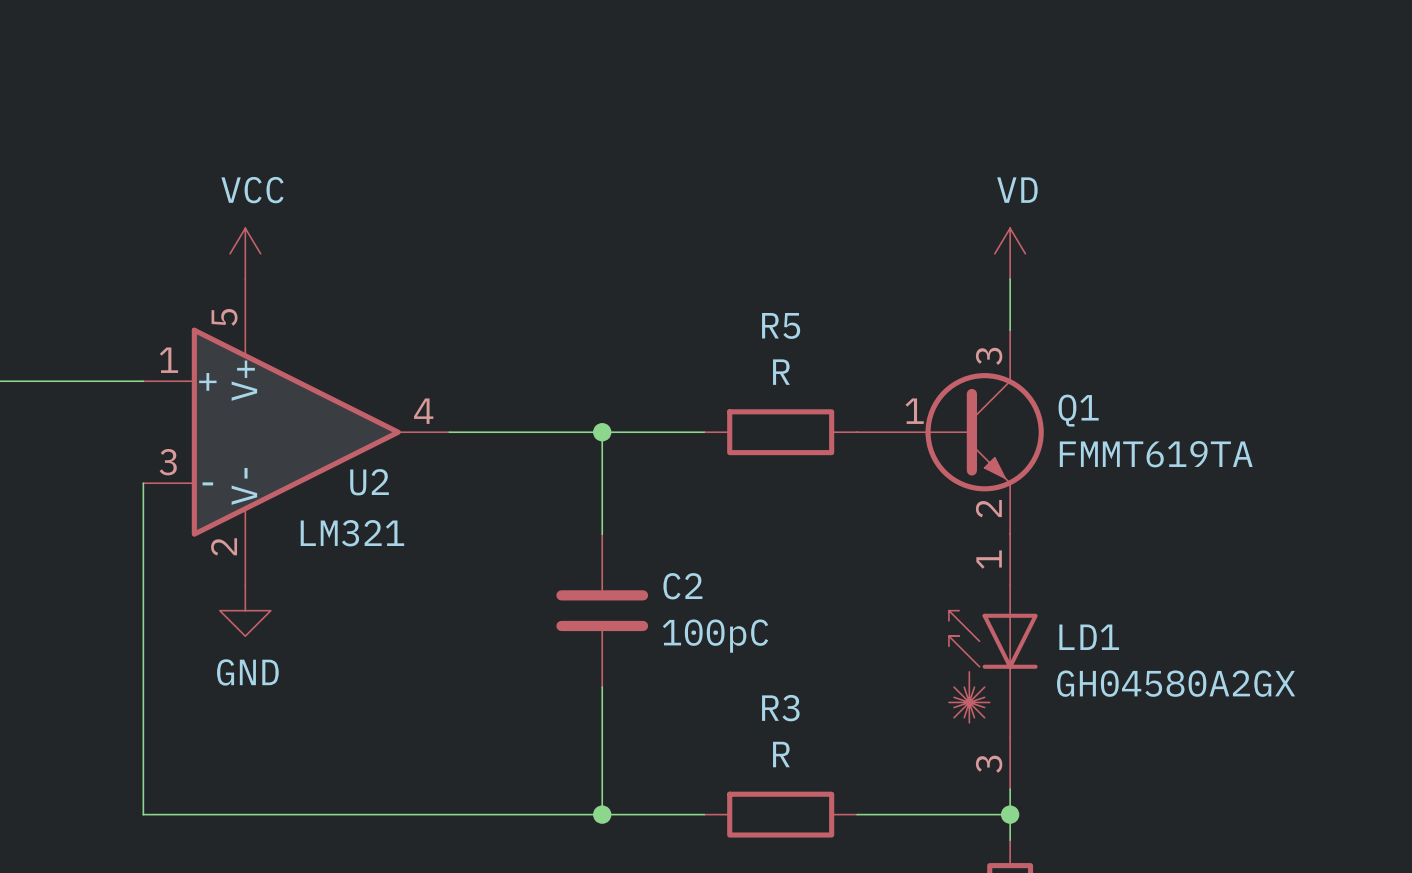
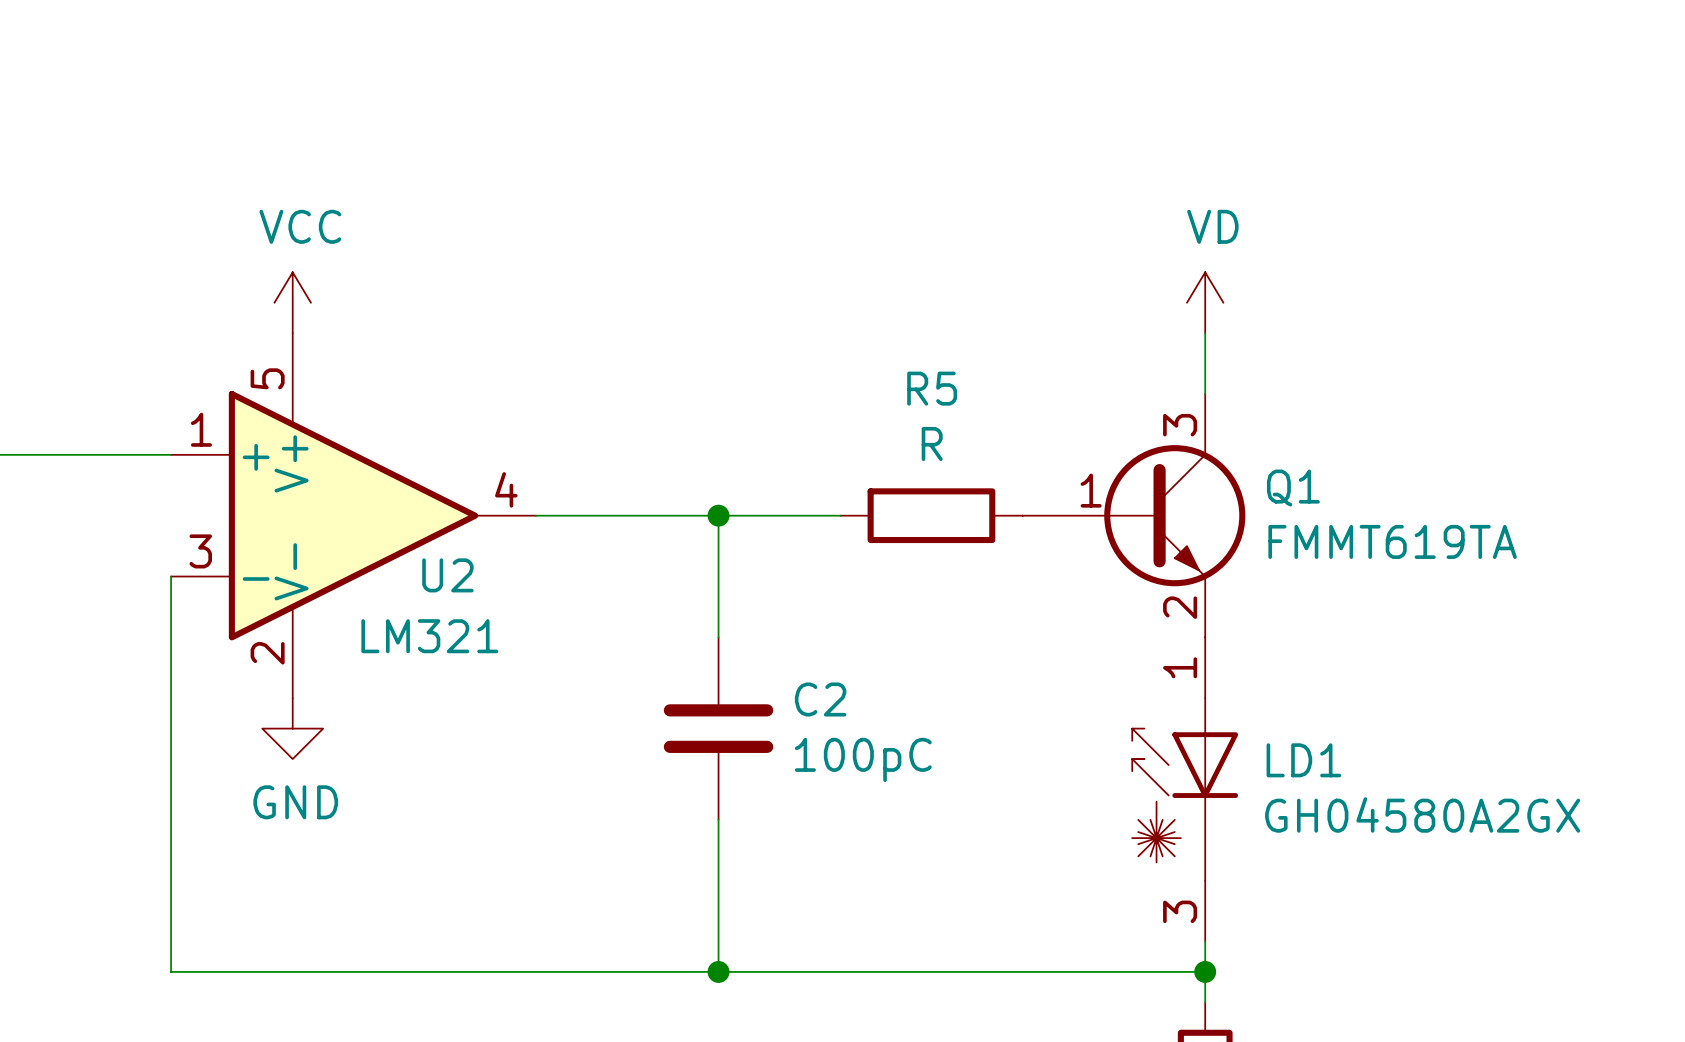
wire: none -> (840, 971) (1022, 971)
R3: R (780, 814) -> none

